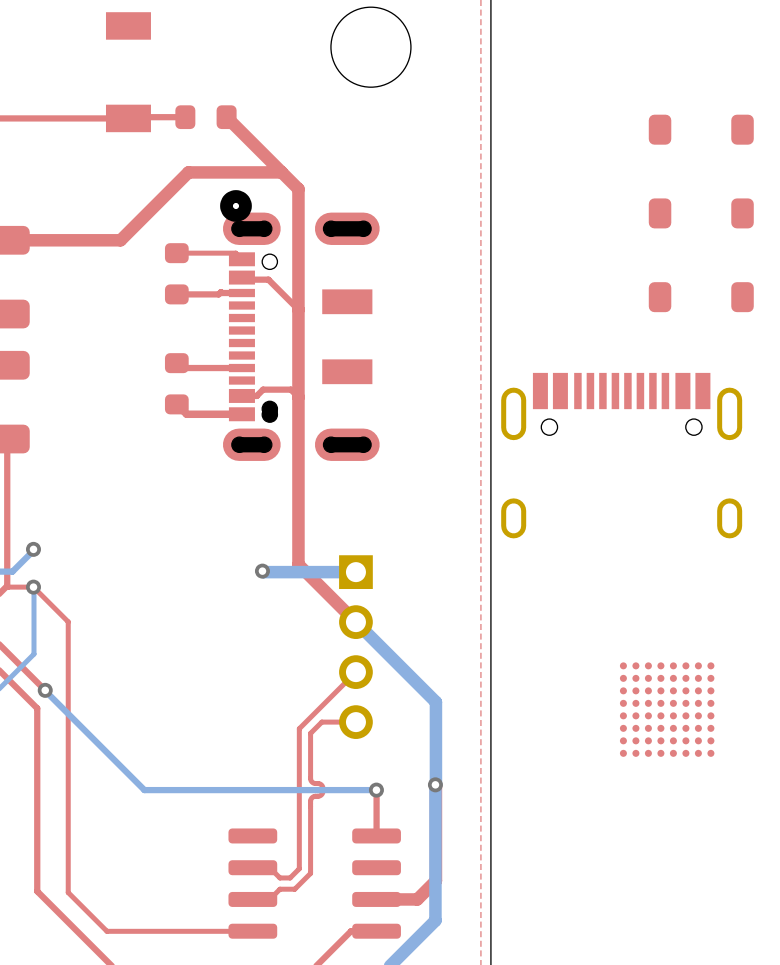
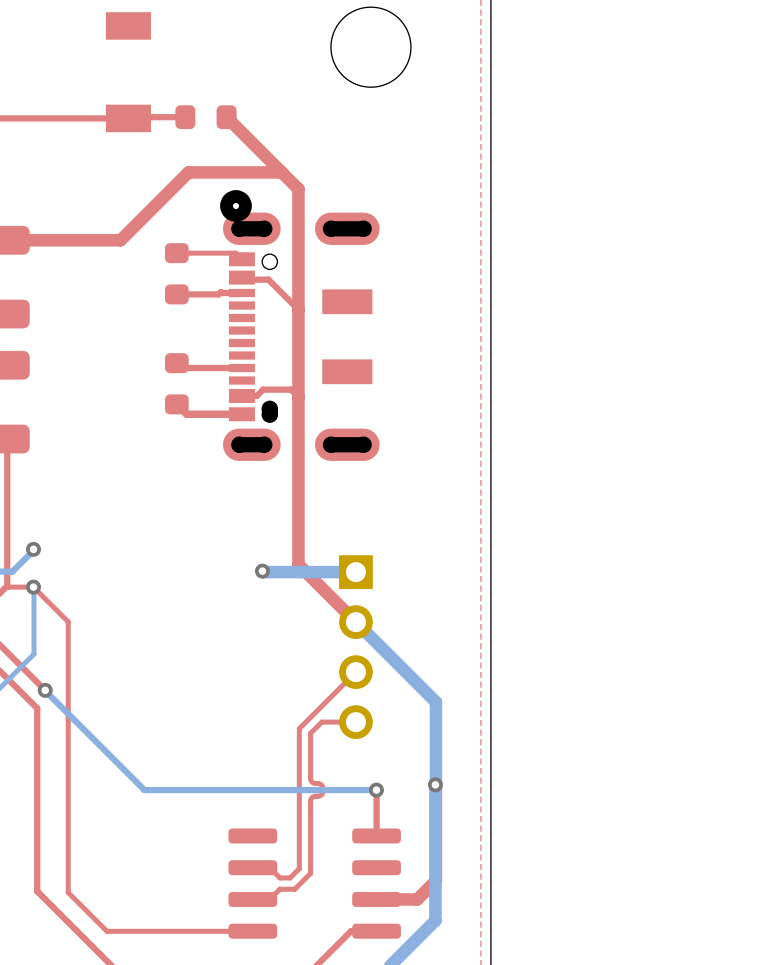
part: (701, 129) -> none
part: (701, 213) -> none
part: (701, 297) -> none
part: (621, 455) -> none
part: (667, 709) -> none

